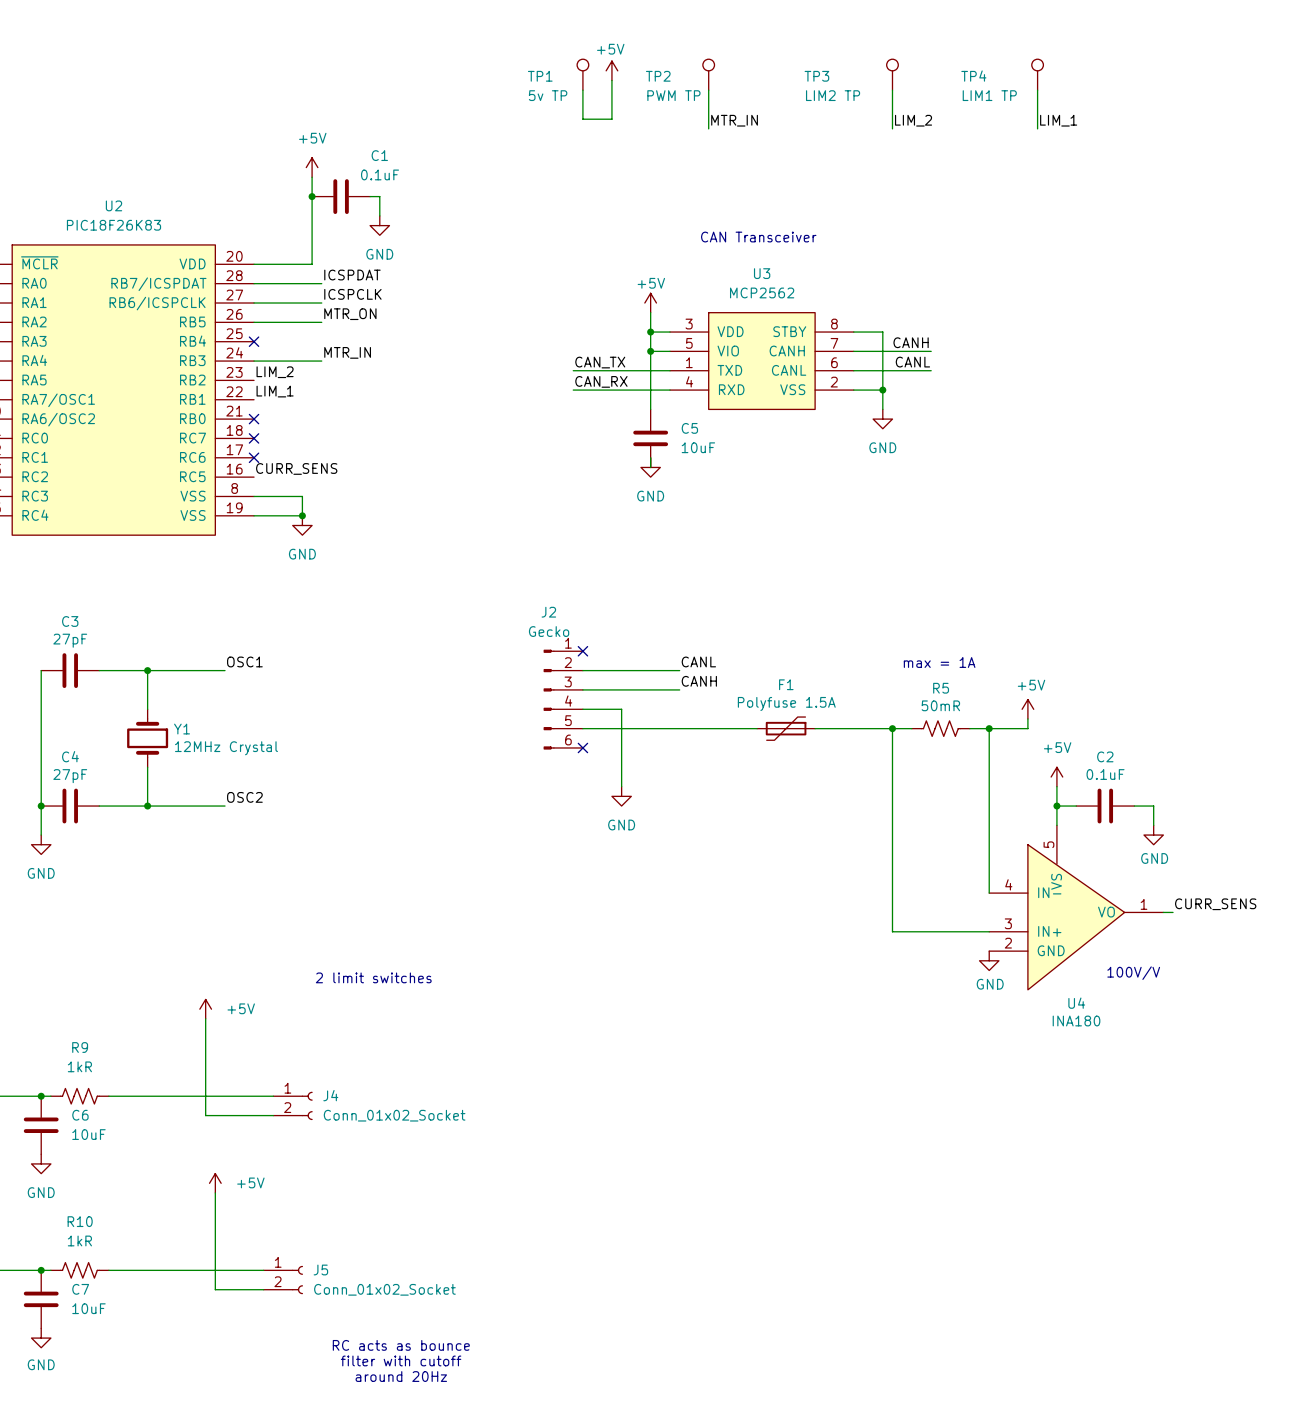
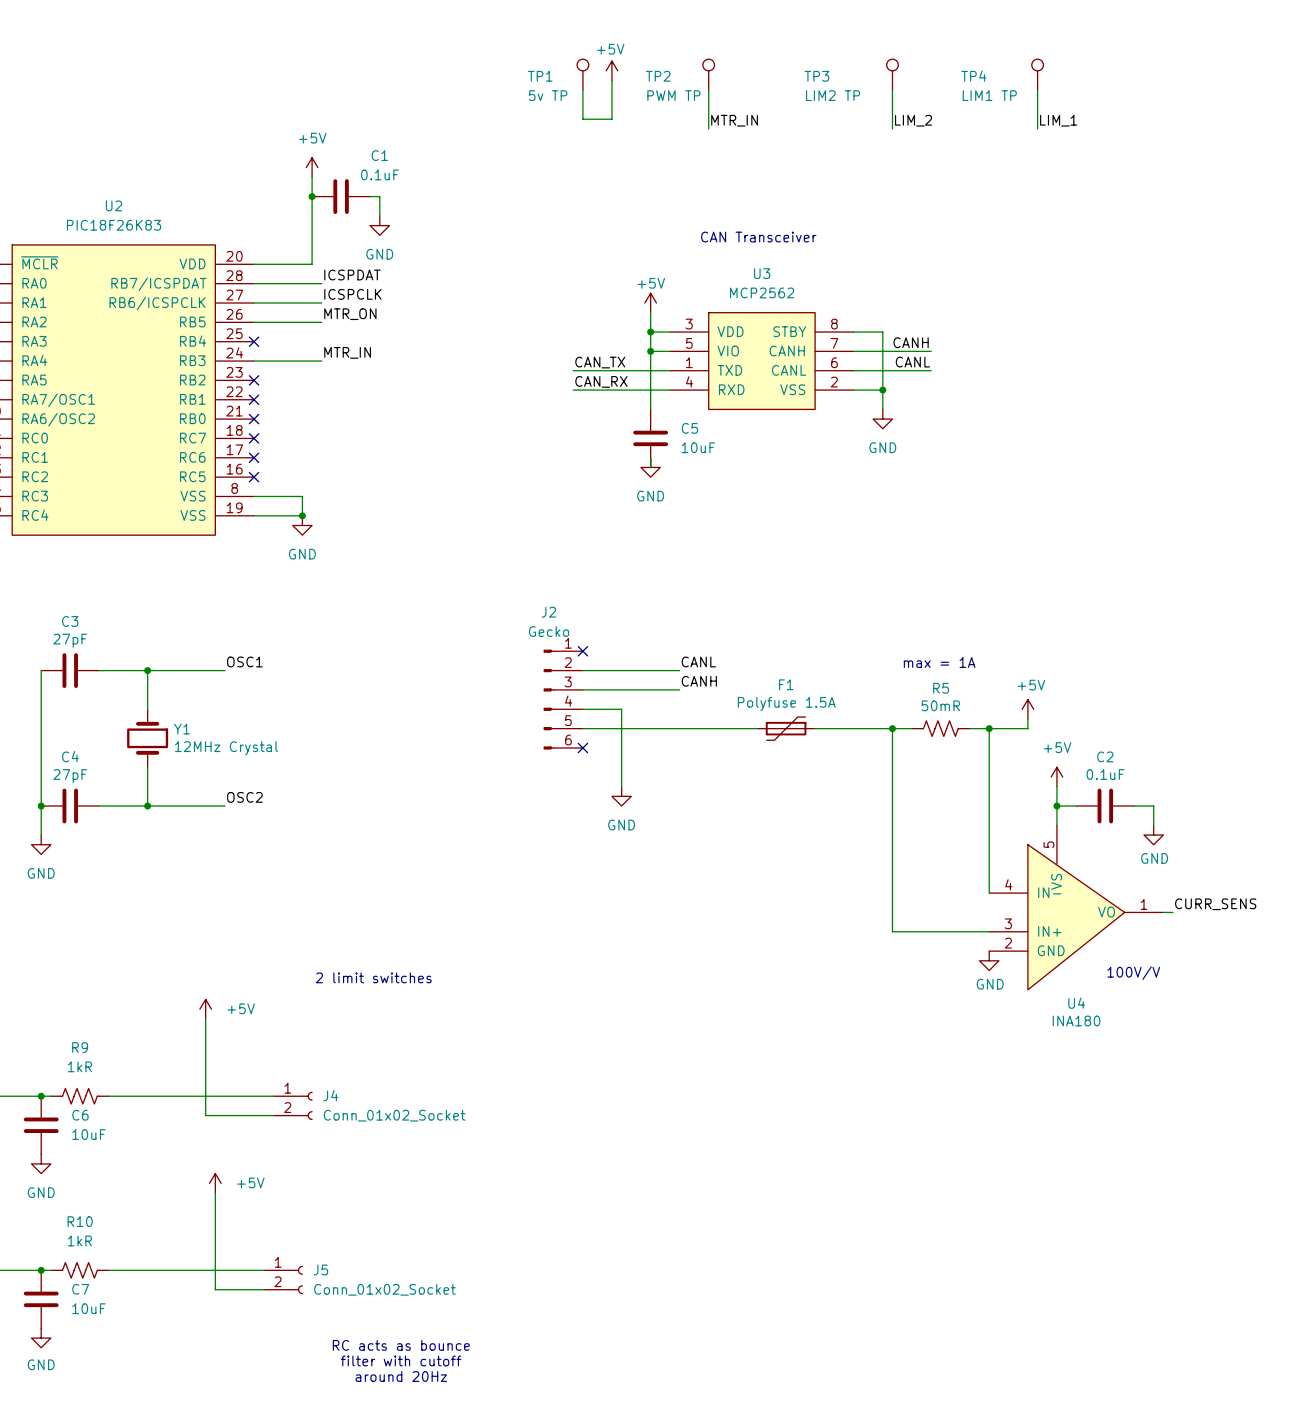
label: LIM_2 (275, 372) -> none
no-connect mark: none -> (254, 380)
label: LIM_1 (275, 391) -> none
no-connect mark: none -> (254, 399)
label: CURR_SENS (296, 468) -> none
no-connect mark: none -> (254, 477)

